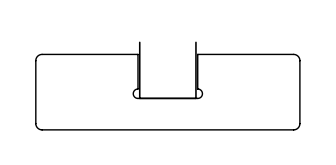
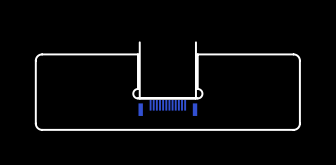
part: (167, 70) -> none
part: none -> (167, 78)

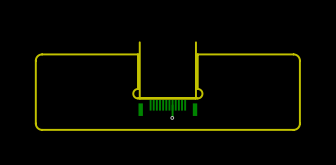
track: none -> (172, 105) (172, 117)
via: none -> (172, 117)

